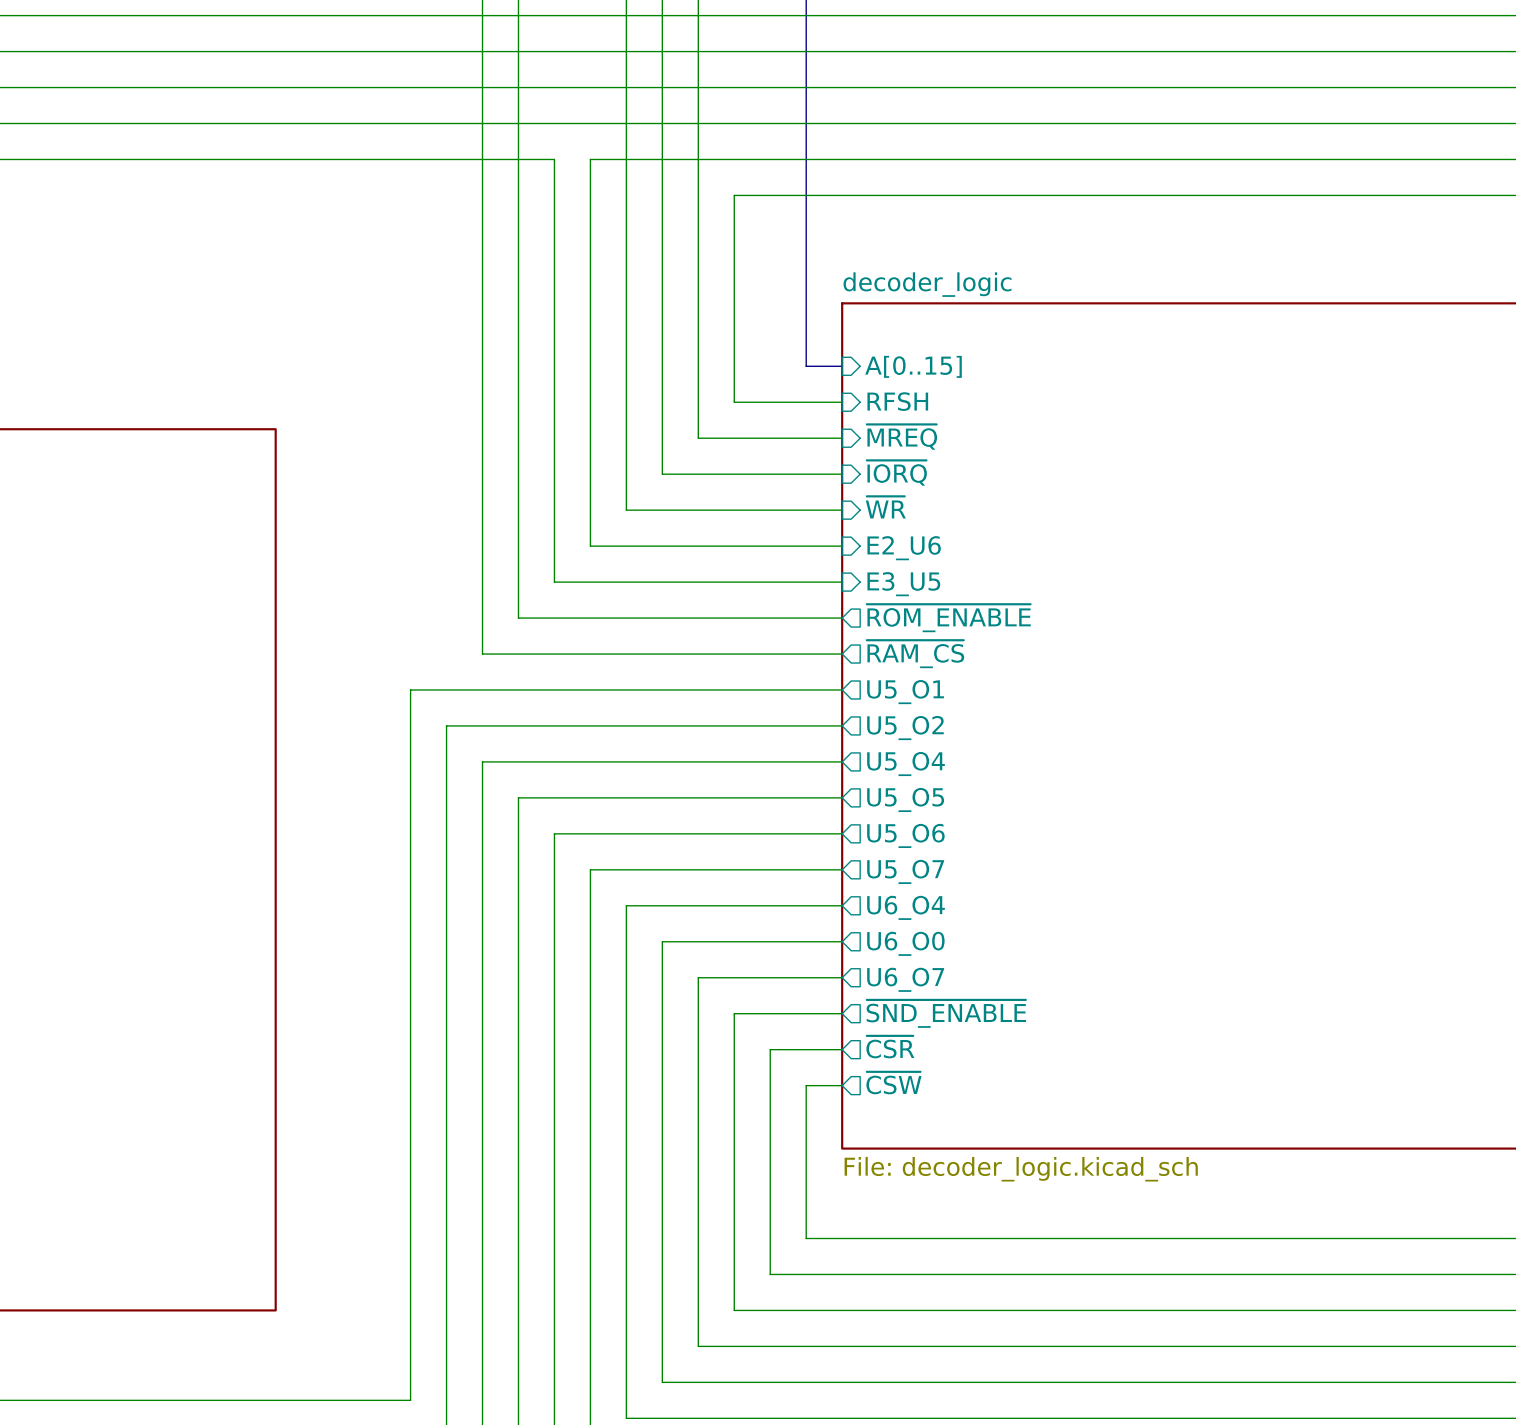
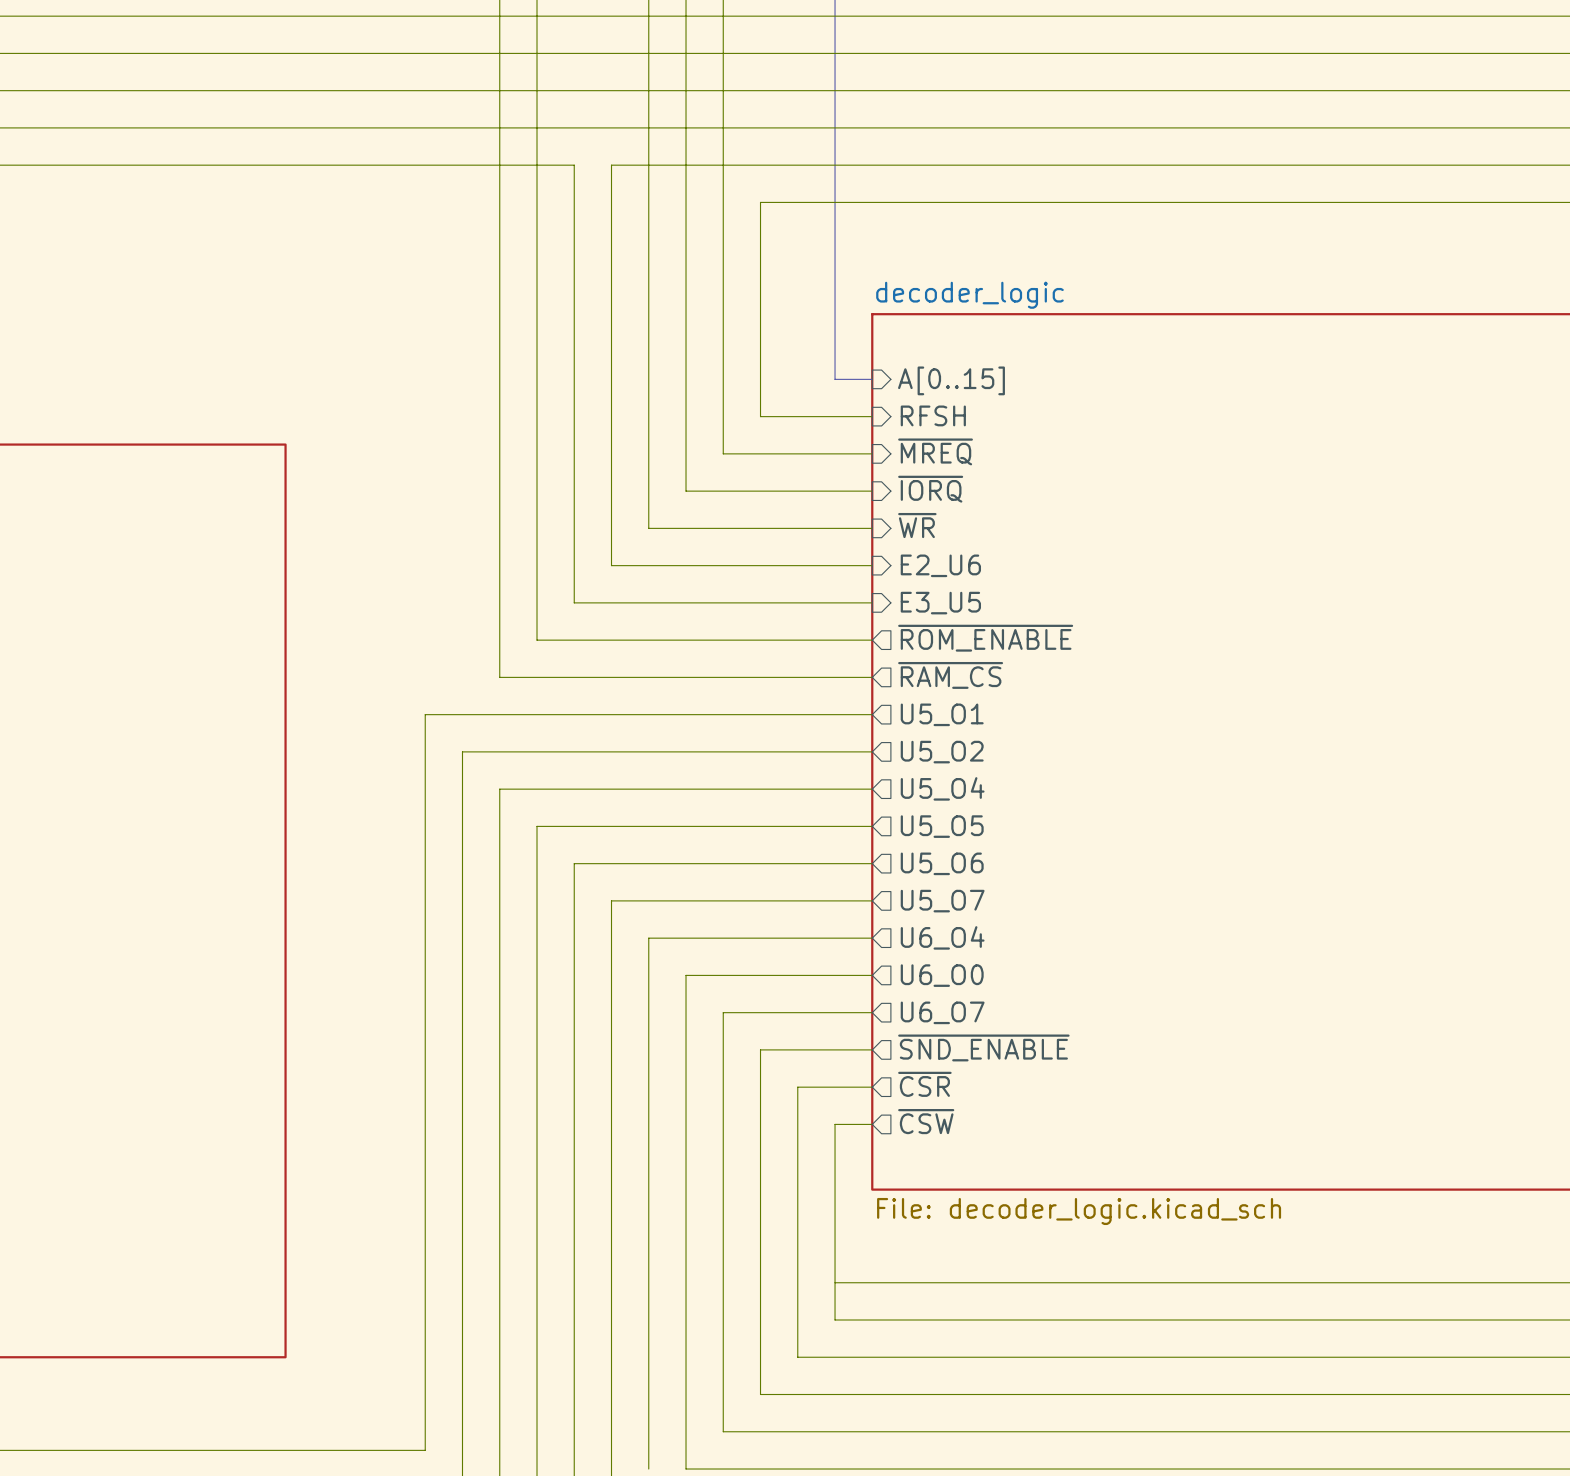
wire: (770, 1274) (806, 1274) -> (835, 1282) (835, 1319)
wire: none -> (797, 1319) (797, 1357)
wire: (734, 1310) (770, 1310) -> (760, 1357) (760, 1394)
wire: (698, 1346) (734, 1346) -> (723, 1394) (723, 1431)
wire: (662, 1382) (698, 1382) -> none
wire: (626, 1418) (662, 1418) -> (686, 1431) (686, 1469)

